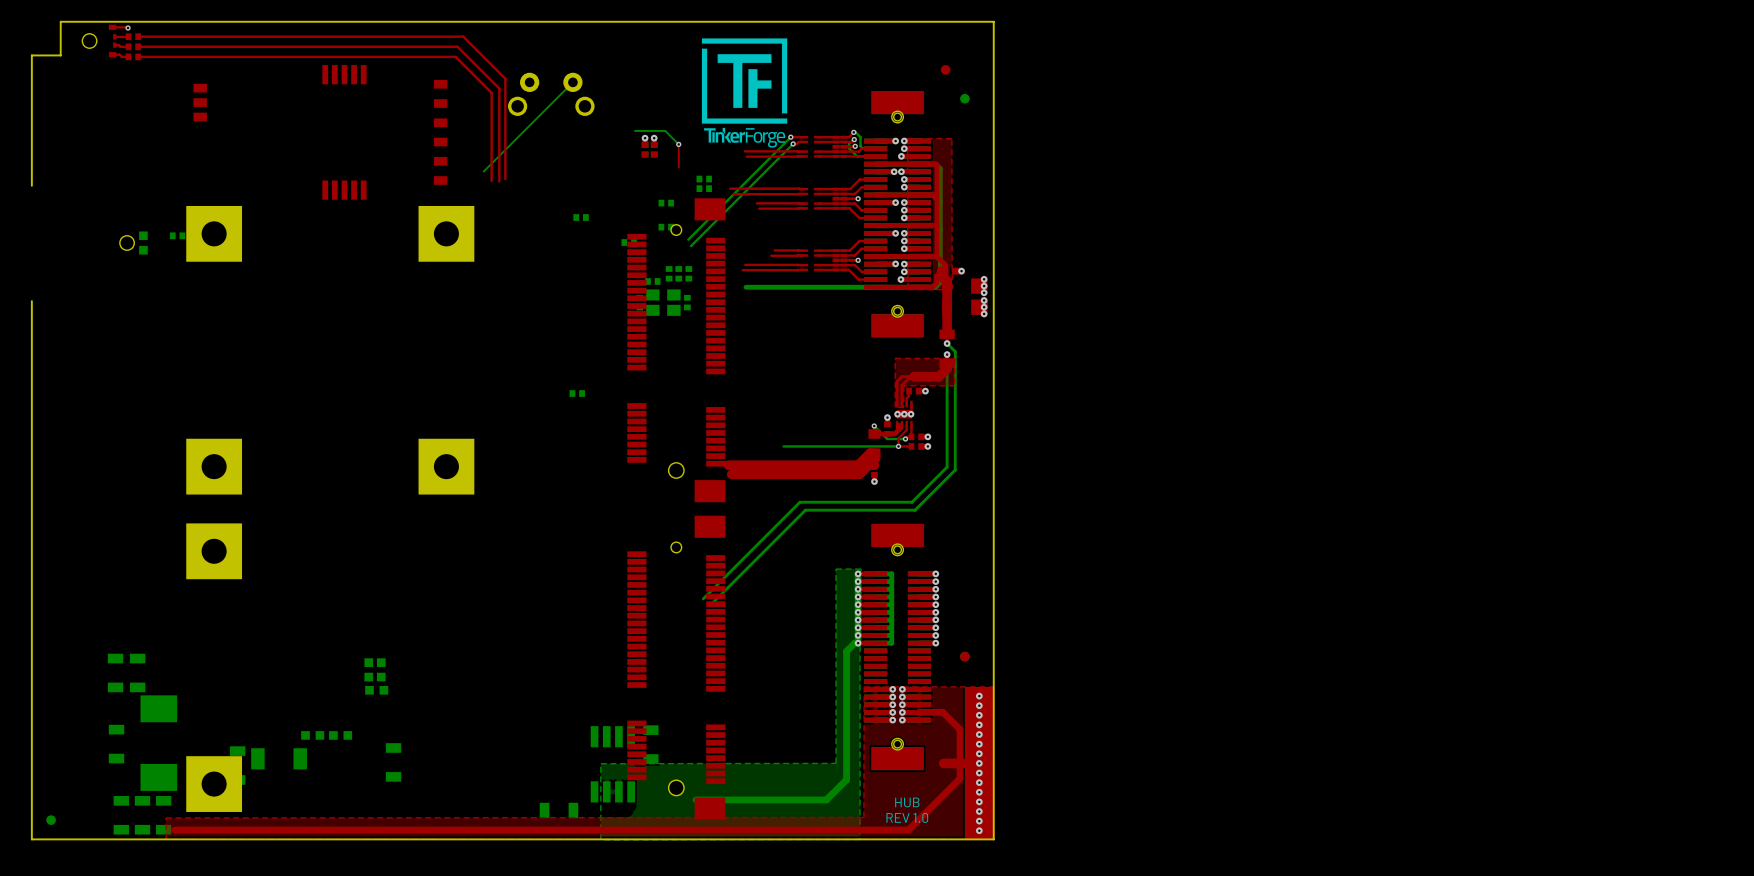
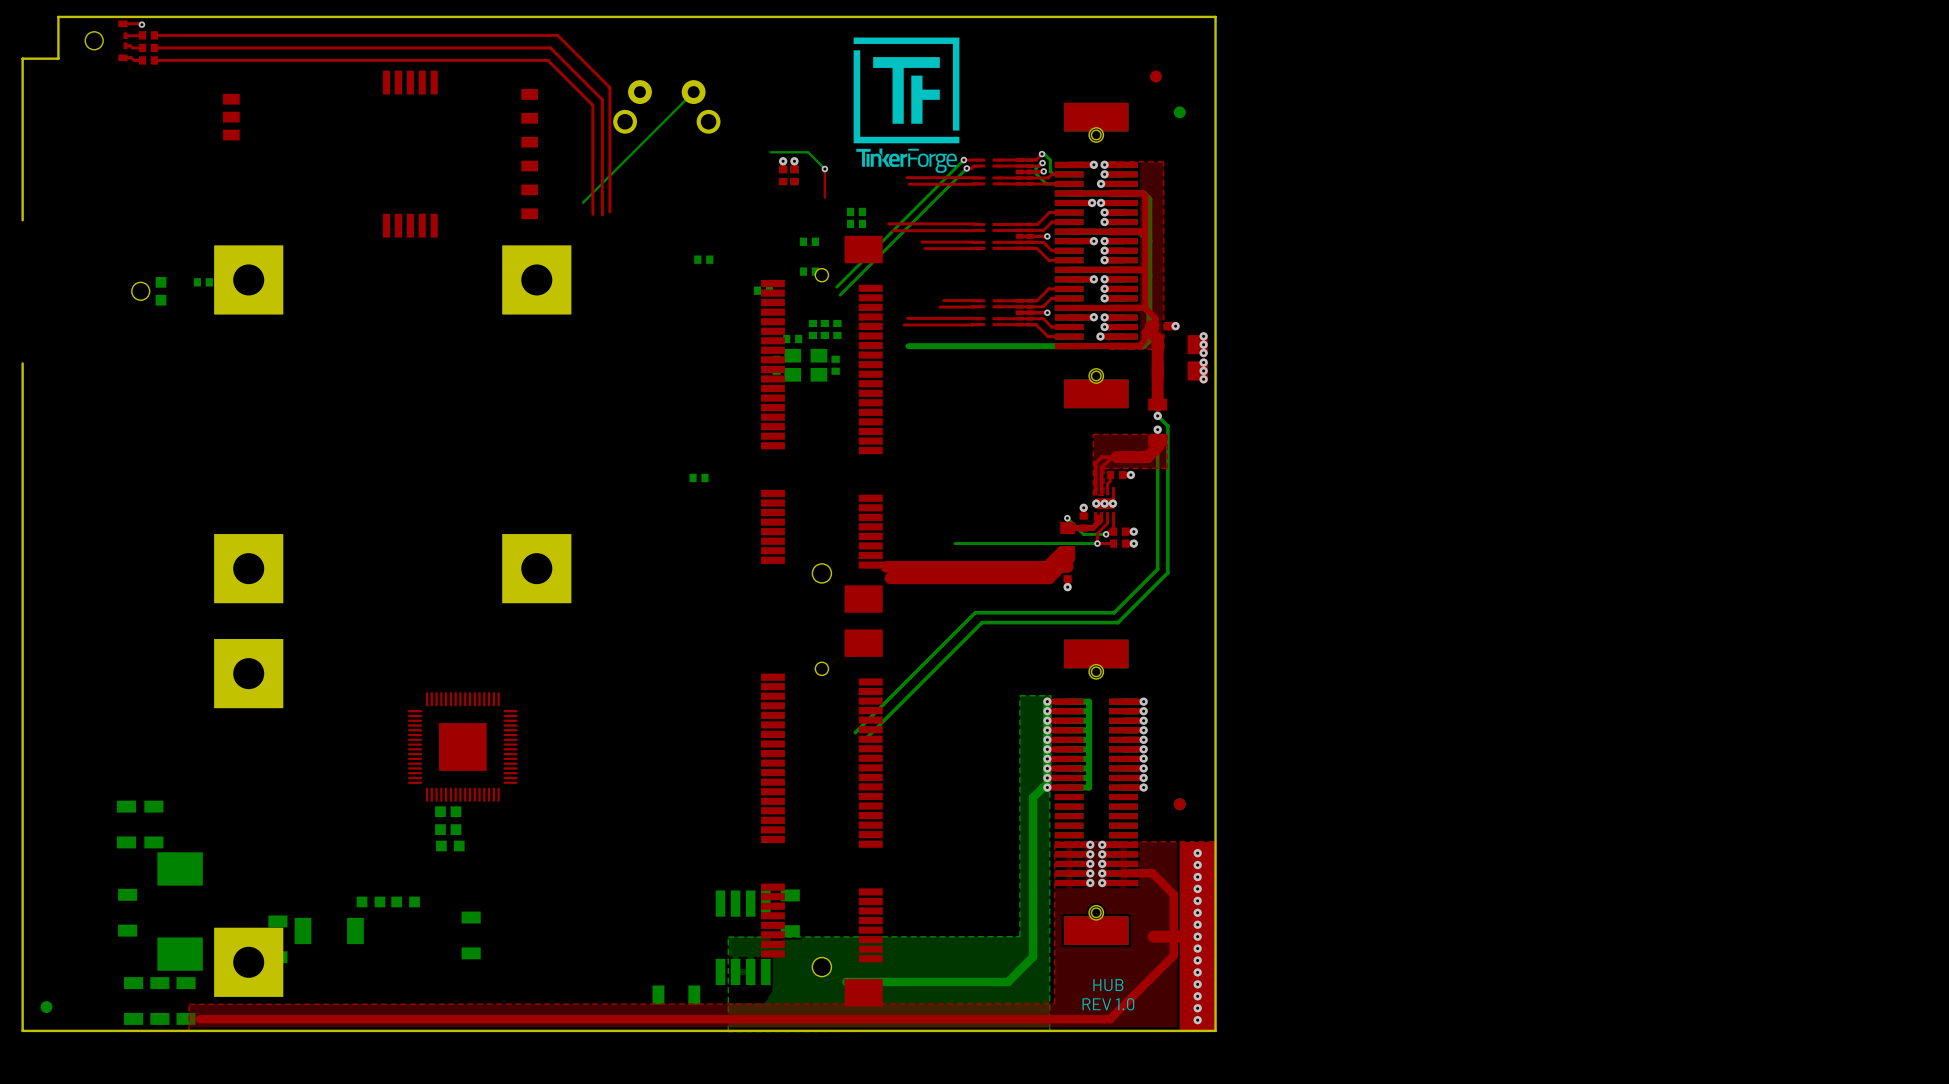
part: none -> (462, 746)

